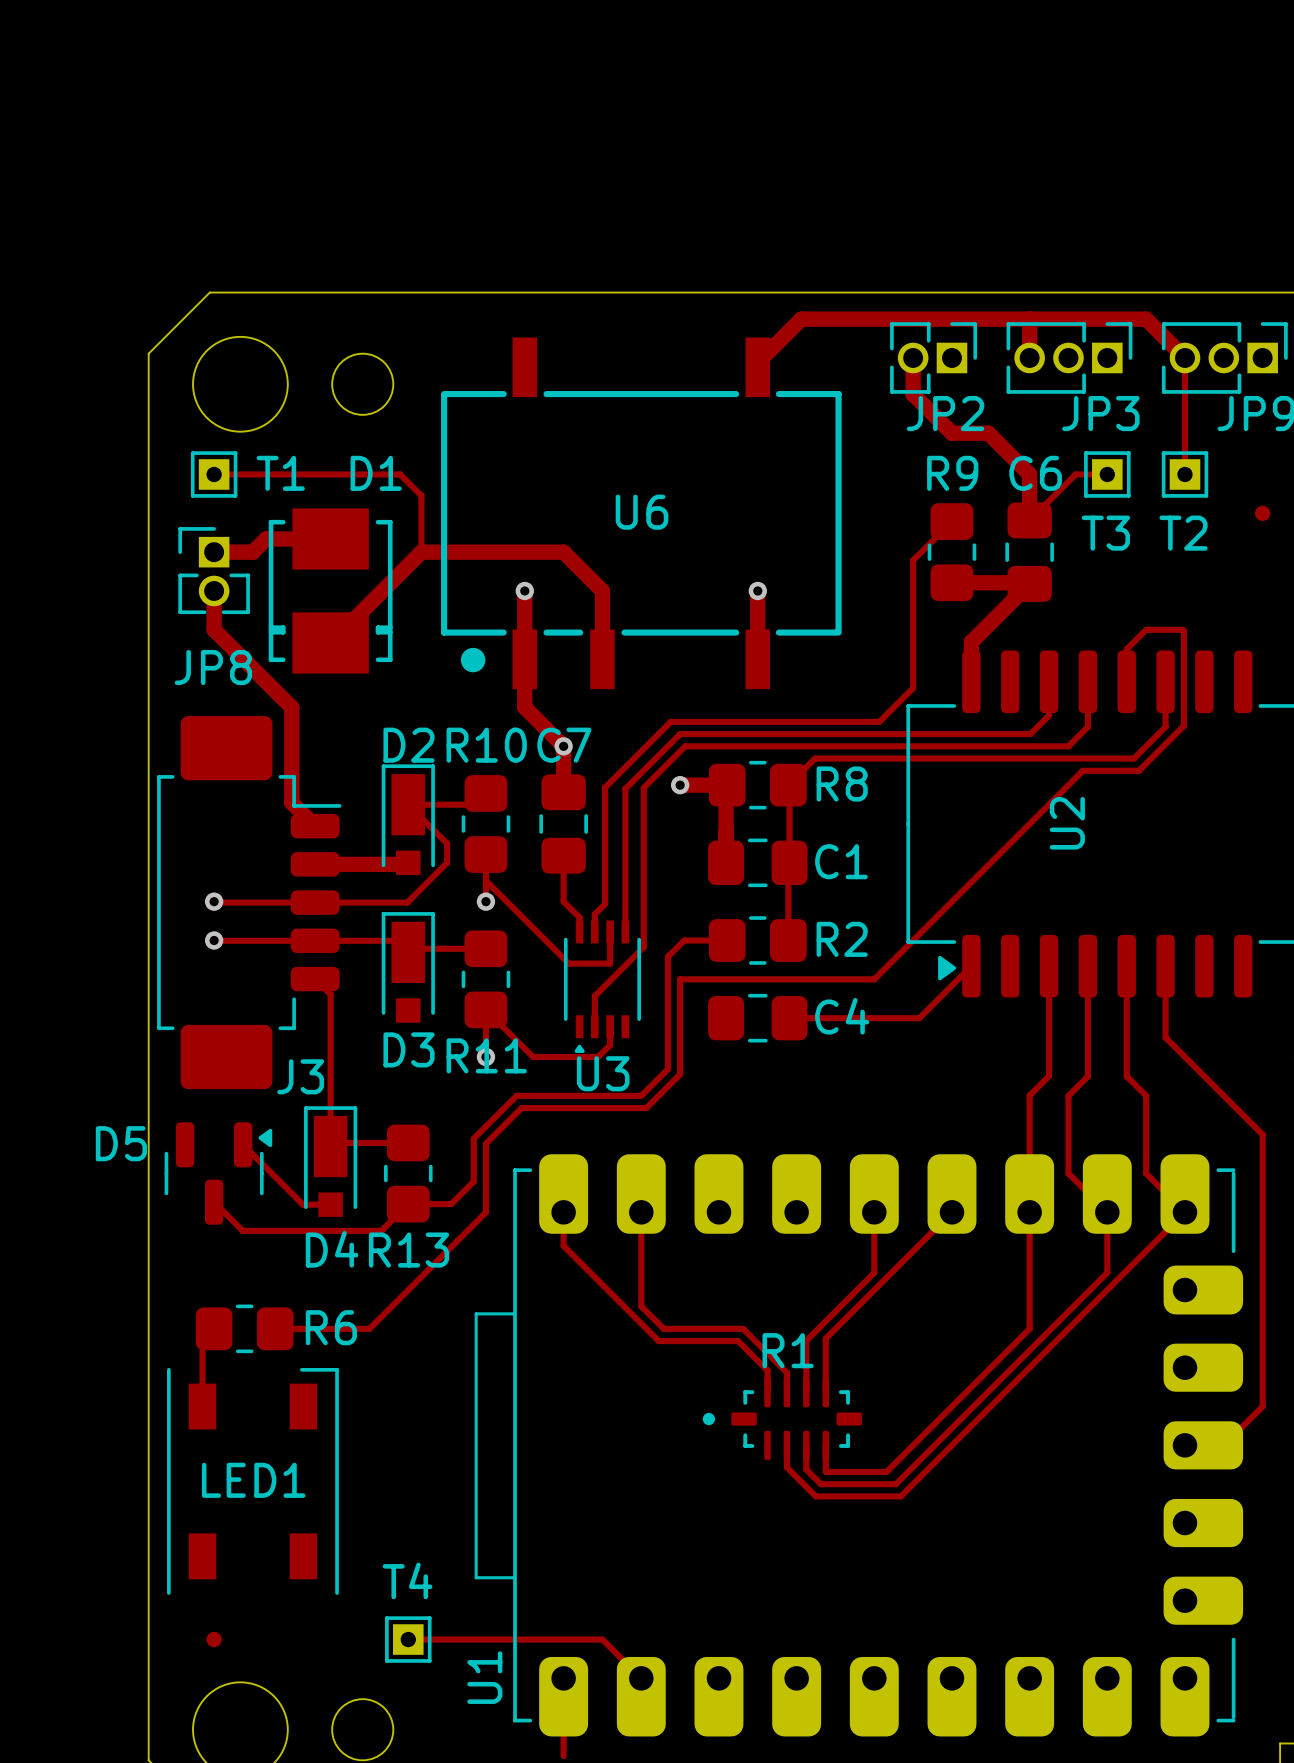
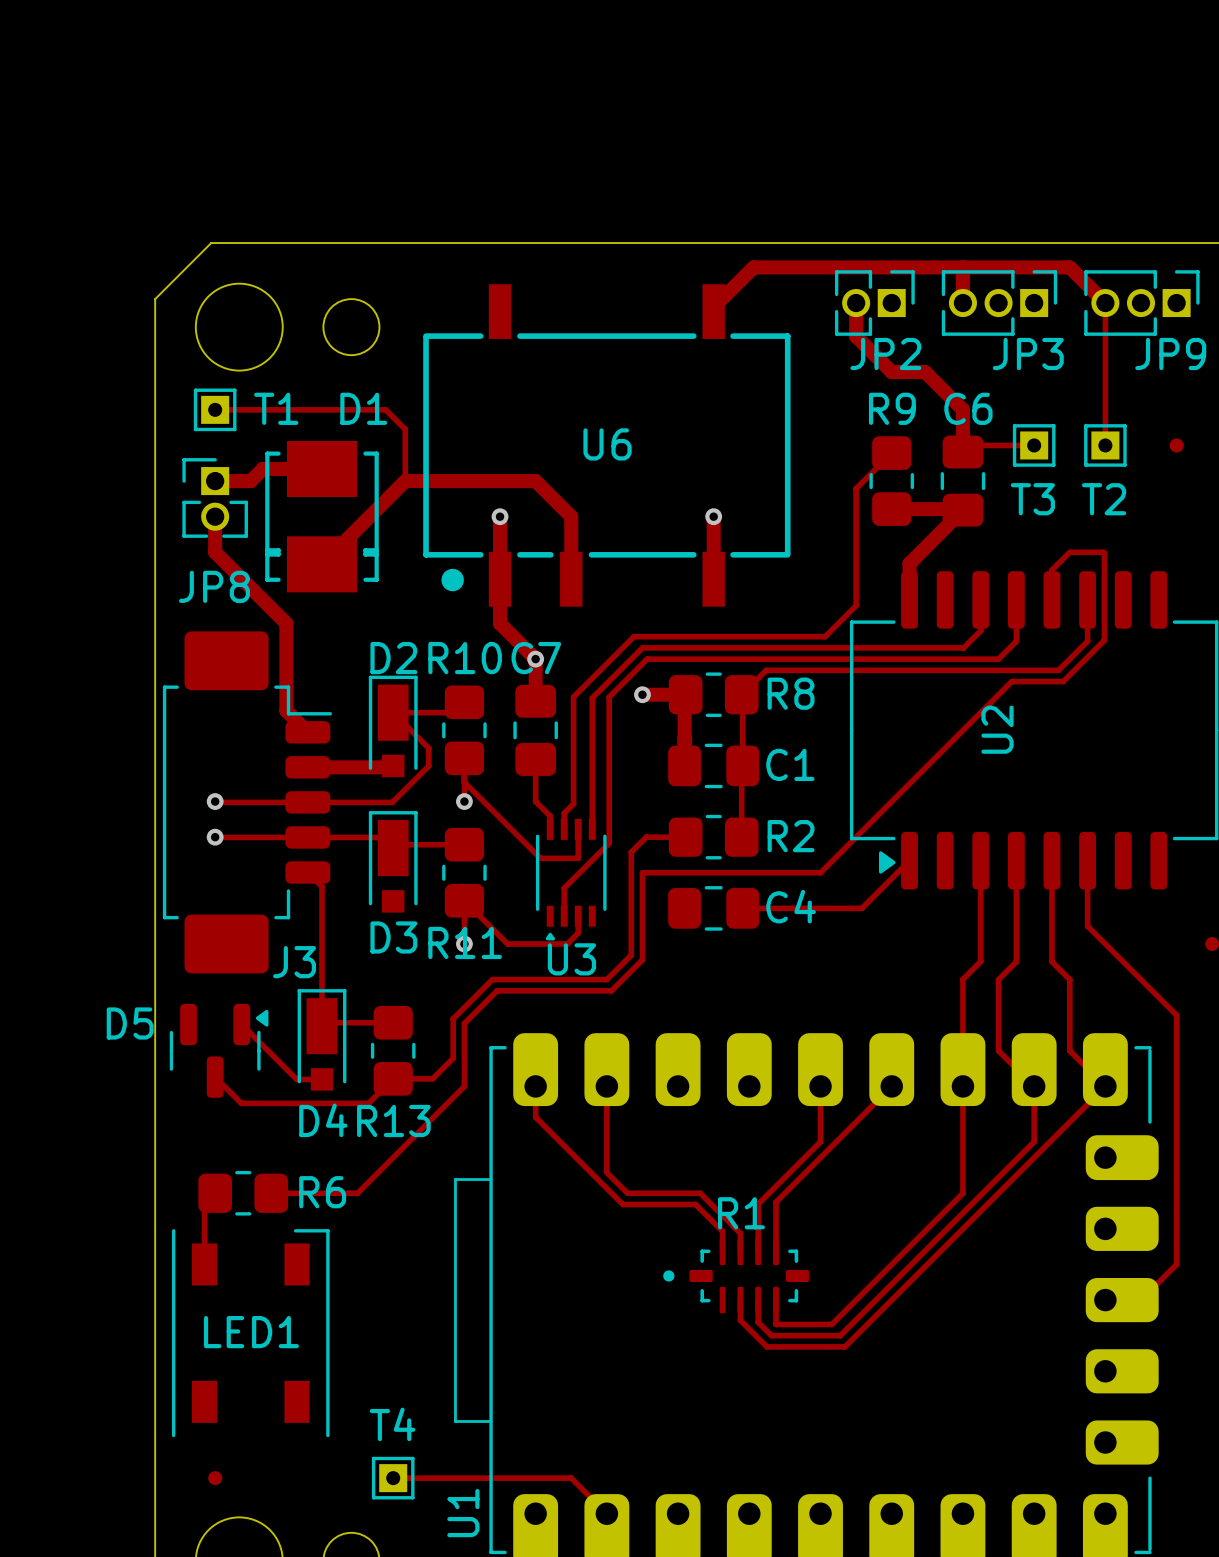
track: (1107, 474) (1075, 474) (1036, 513) -> (1034, 445) (969, 445)
T3 position: (1107, 474) -> (1034, 445)
track: none -> (1105, 409) (1105, 445)
T2 position: (1184, 474) -> (1105, 445)

